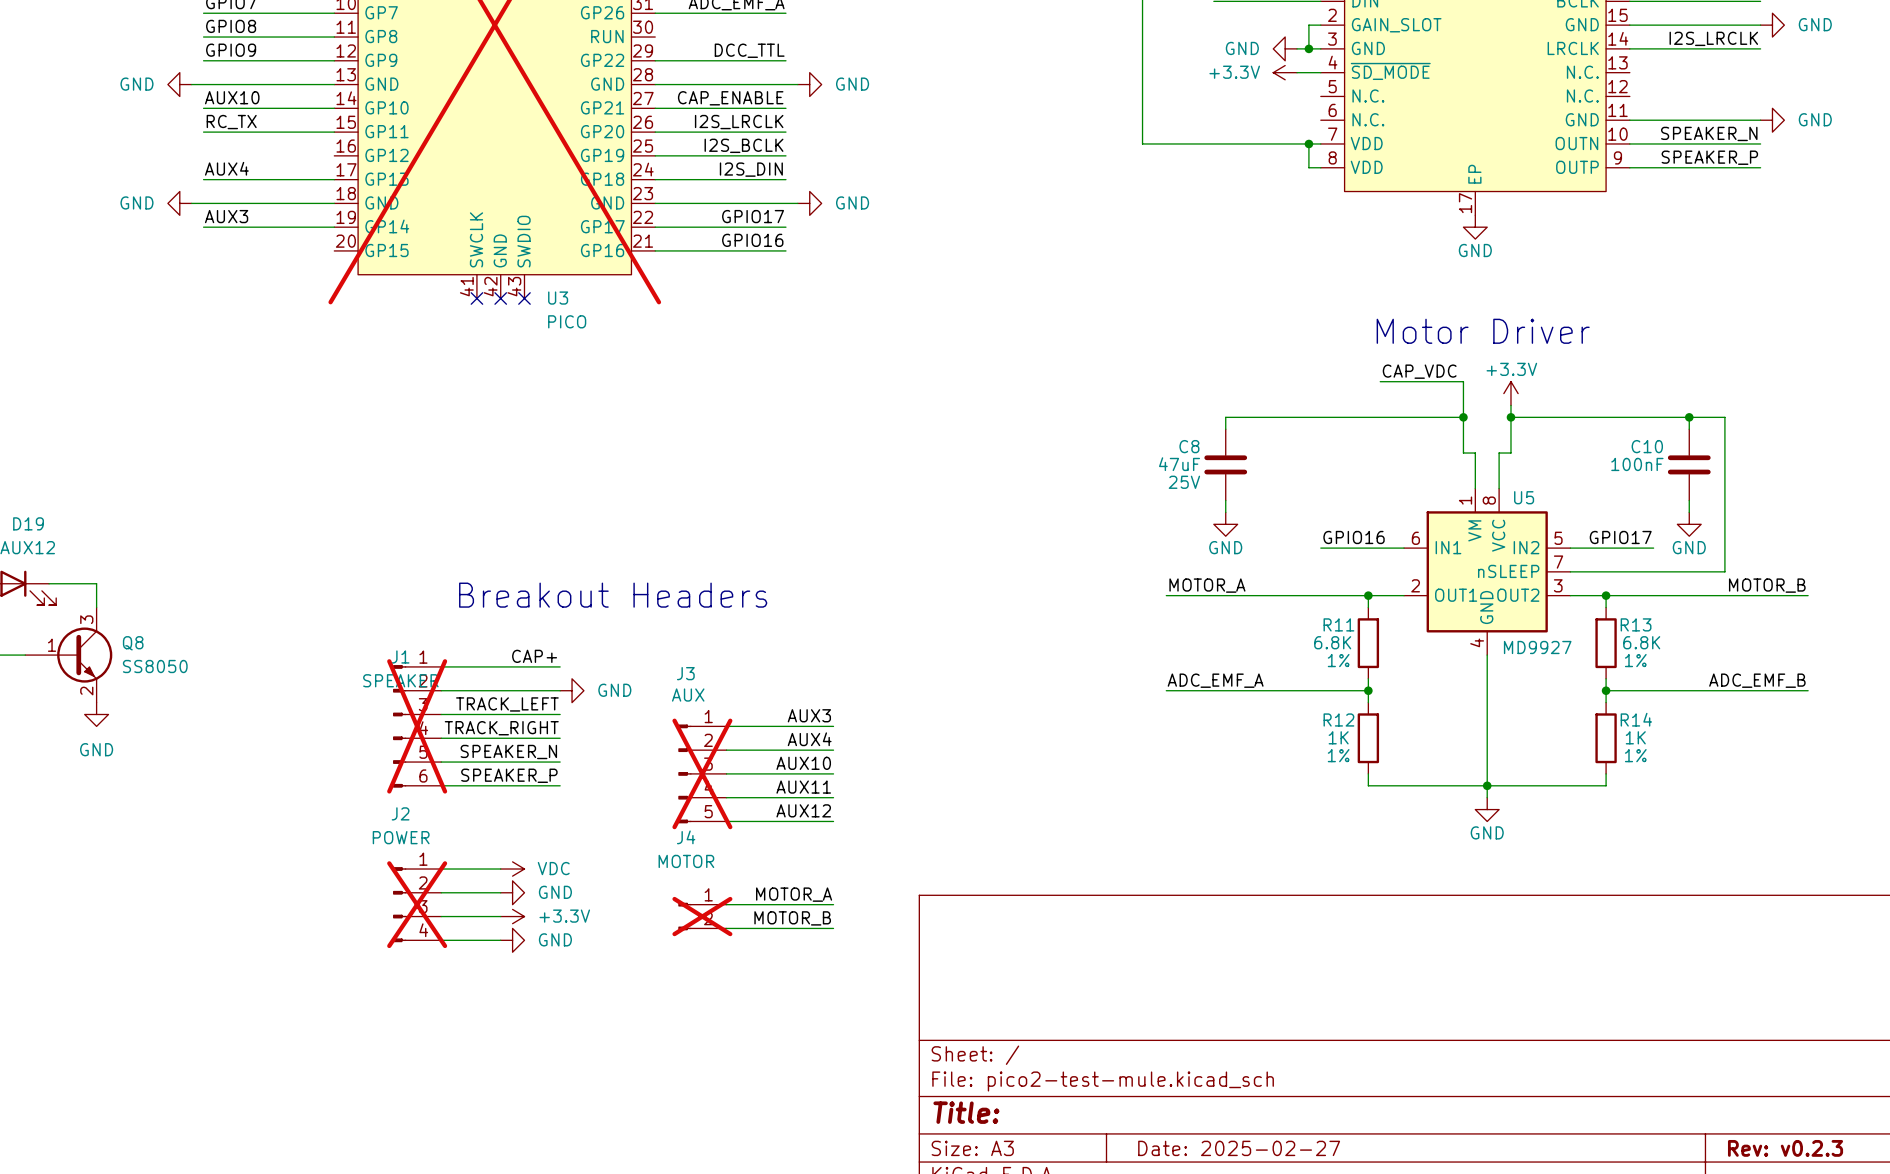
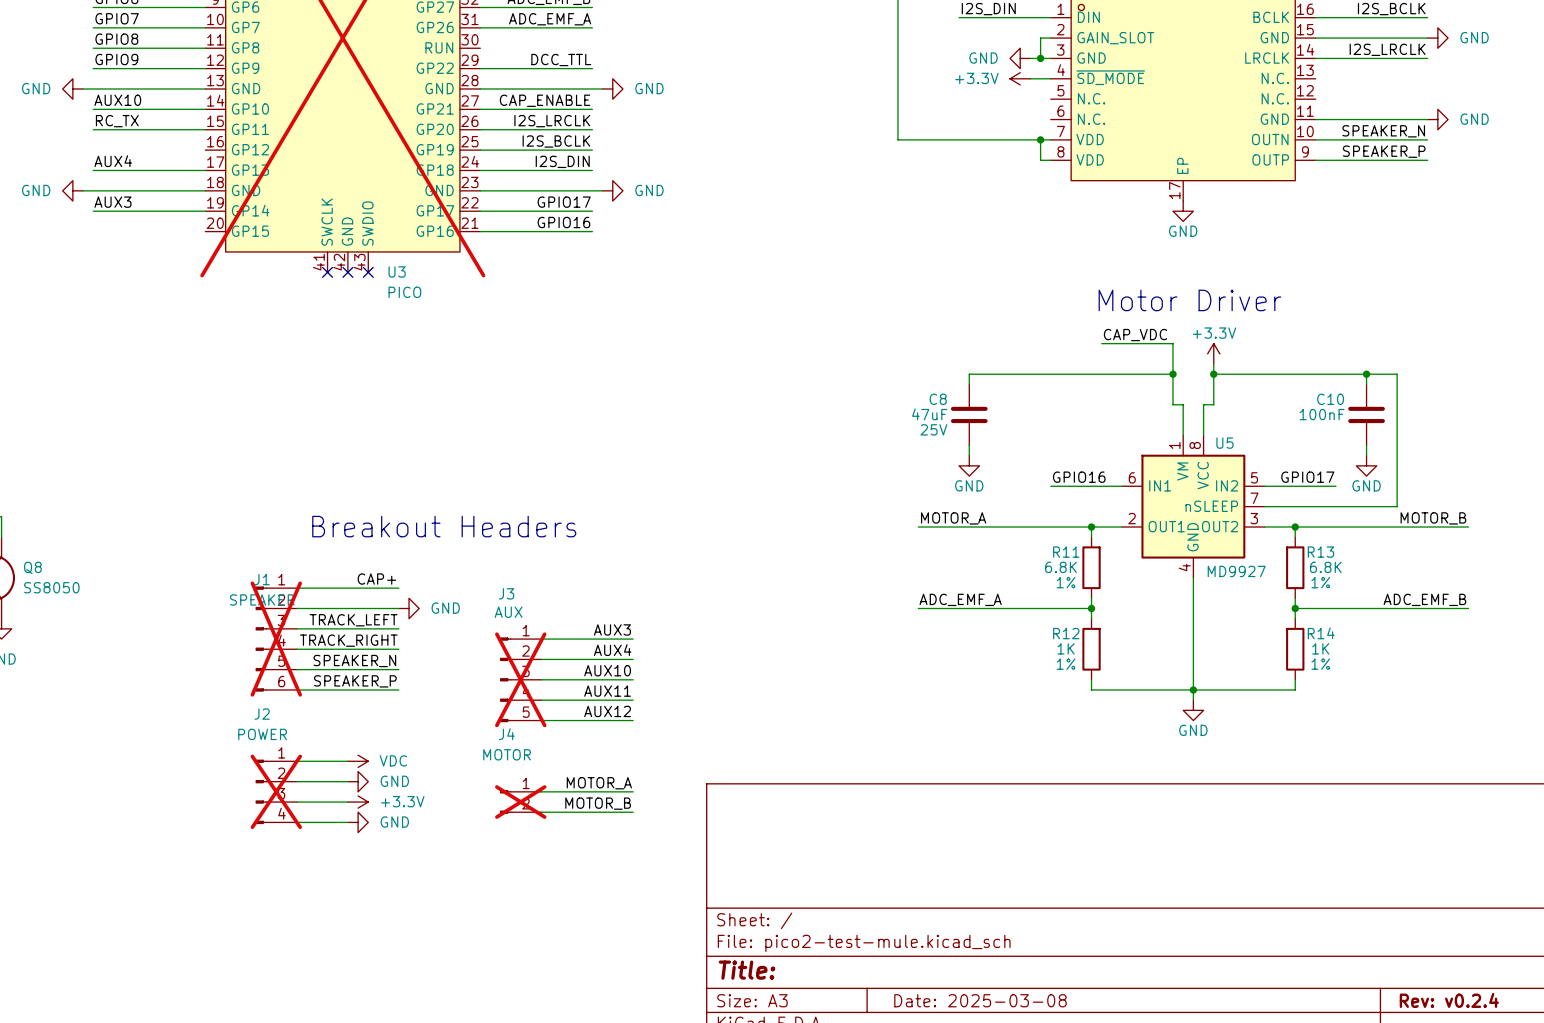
title block: Date: 2025-02-27 (1239, 1148) -> Date: 2025-03-08 (980, 1000)
title block: Rev: v0.2.3 (1785, 1148) -> Rev: v0.2.4 (1449, 1000)

